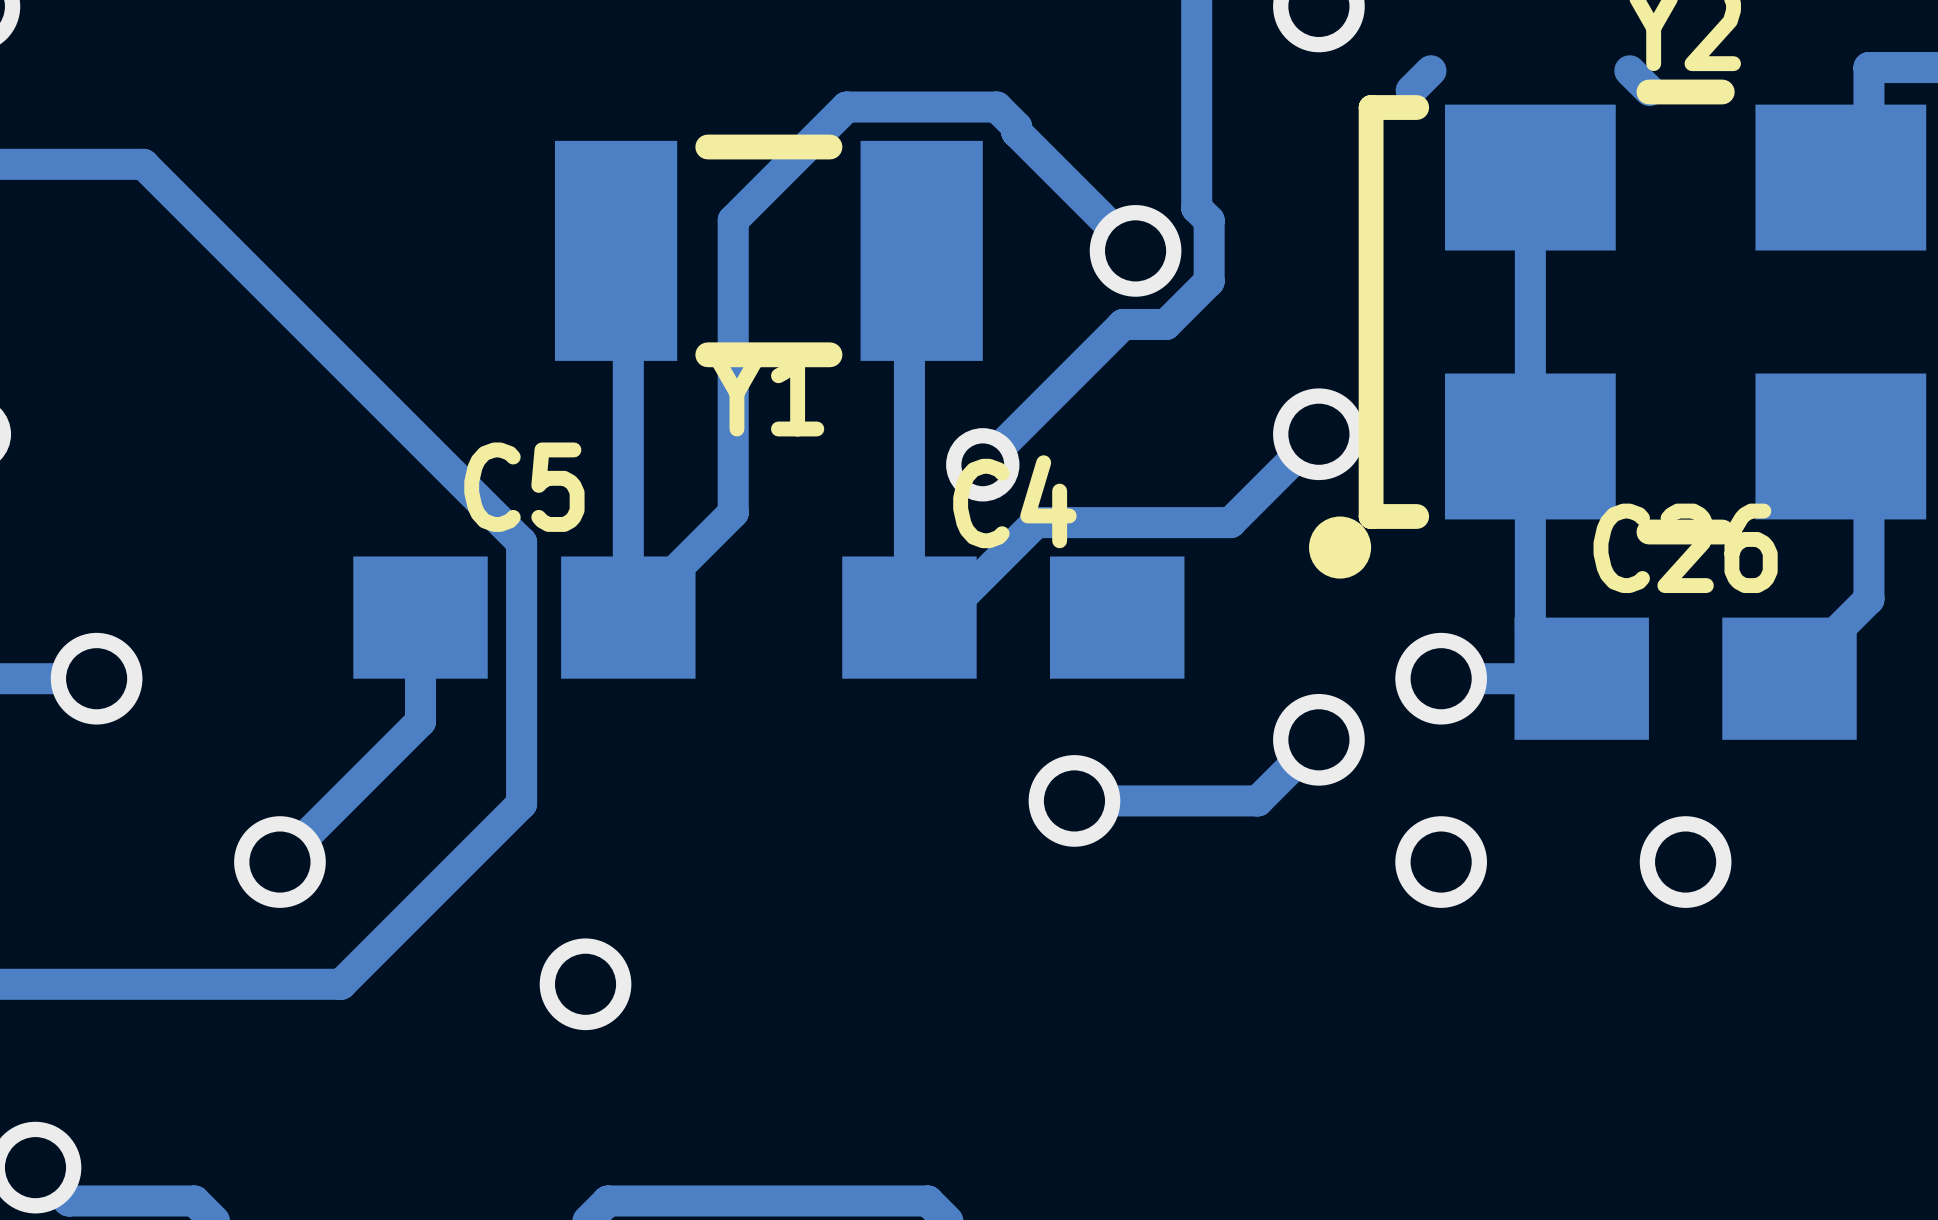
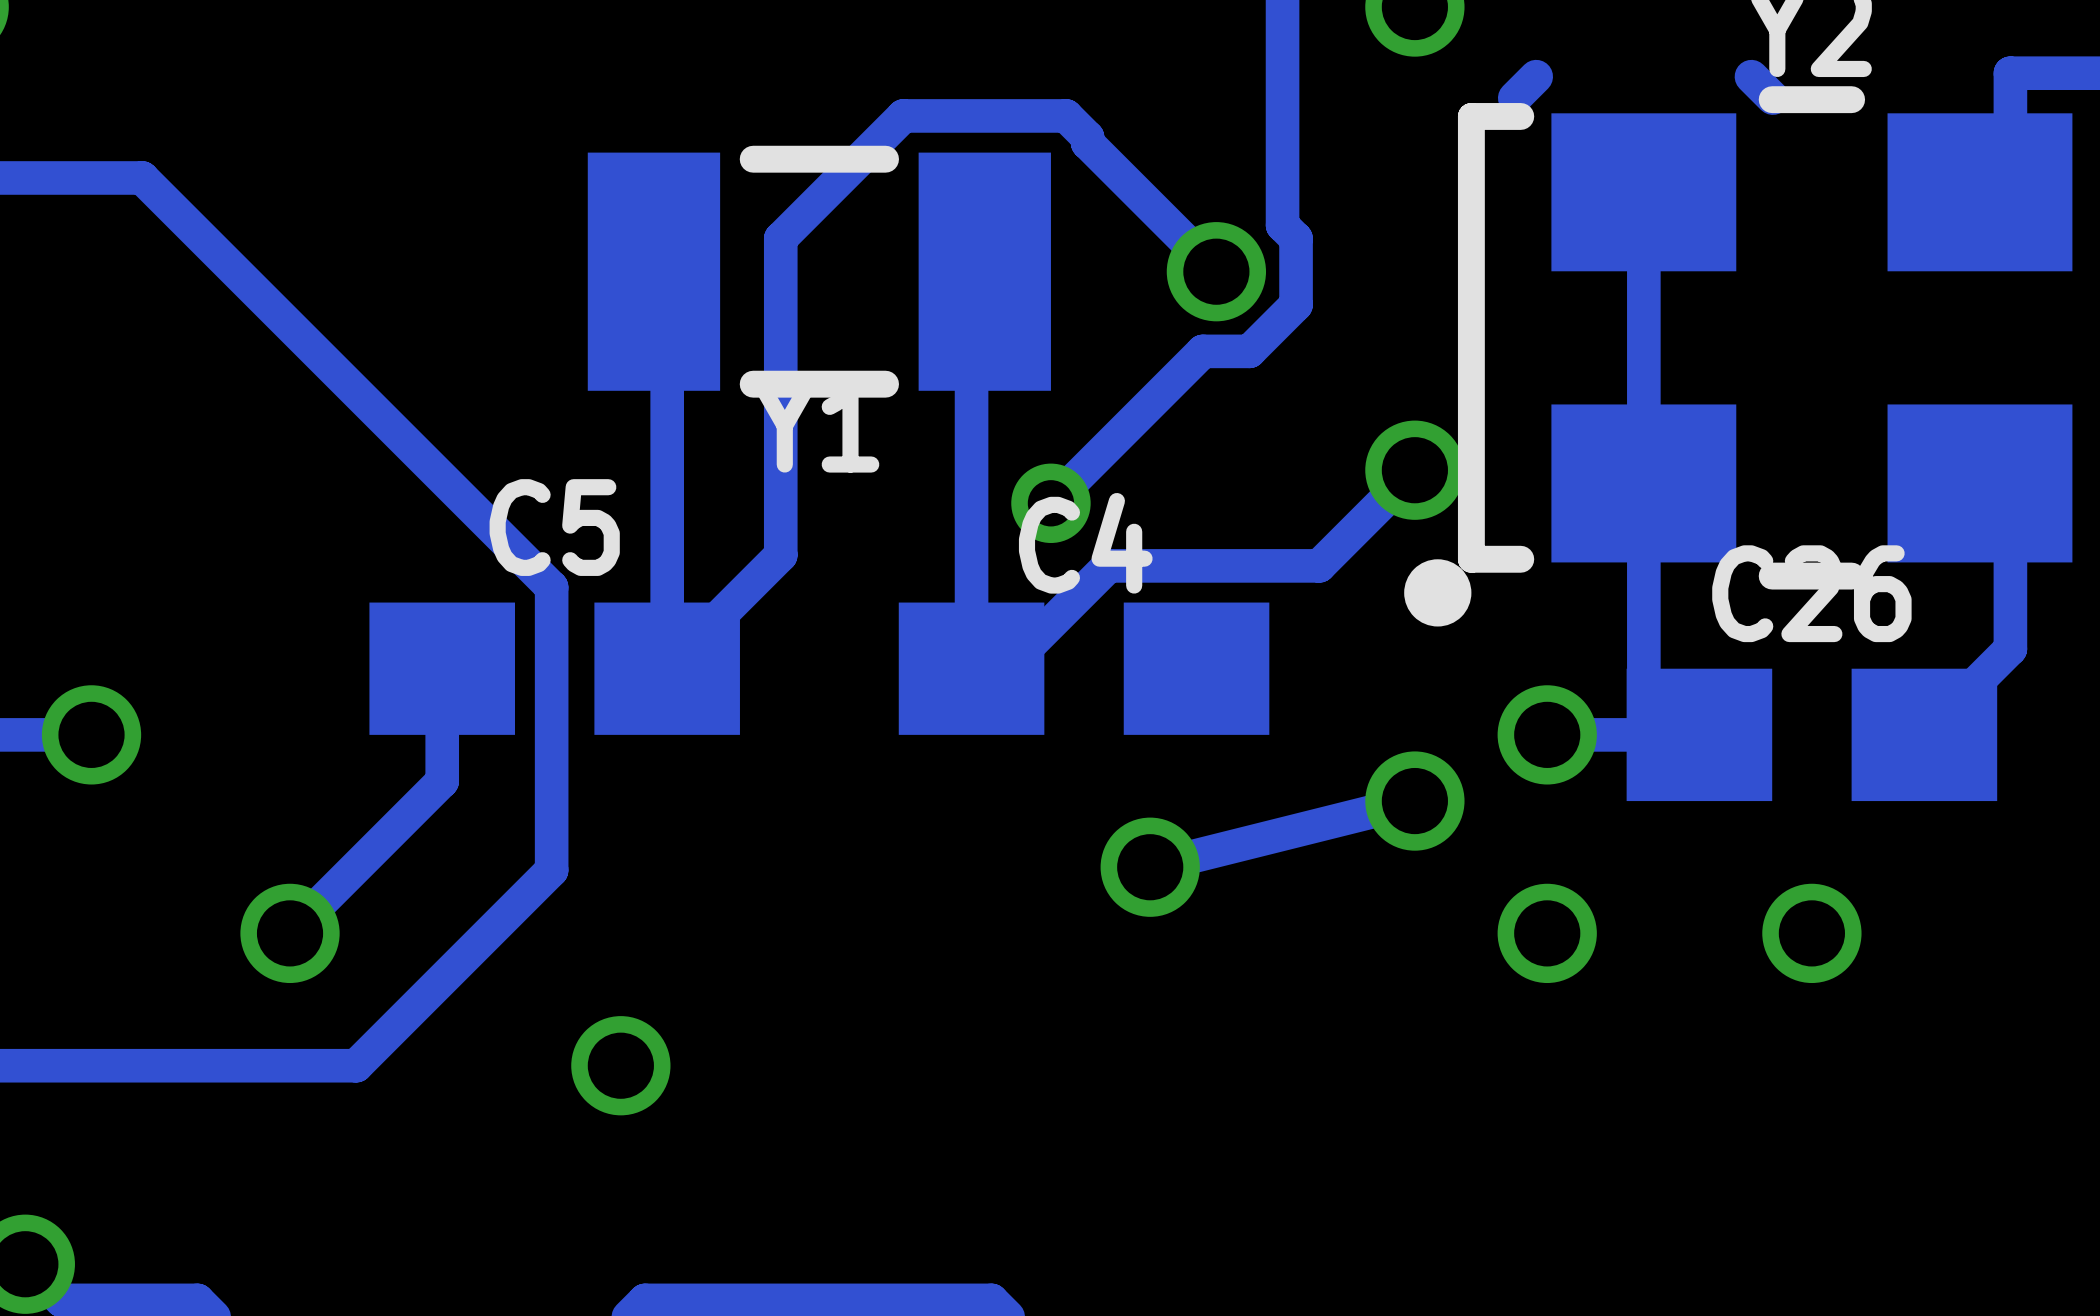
track: (1318, 739) (1257, 800) (1074, 800) -> (1414, 801) (1150, 867)

